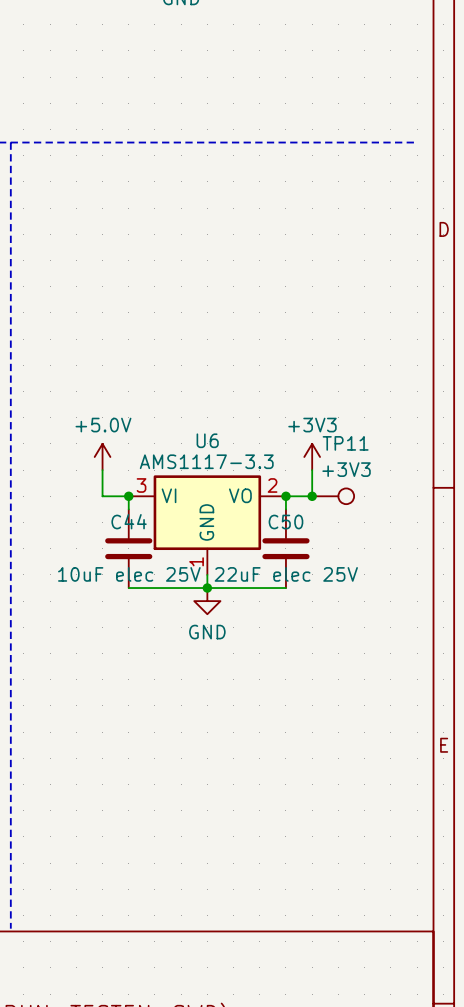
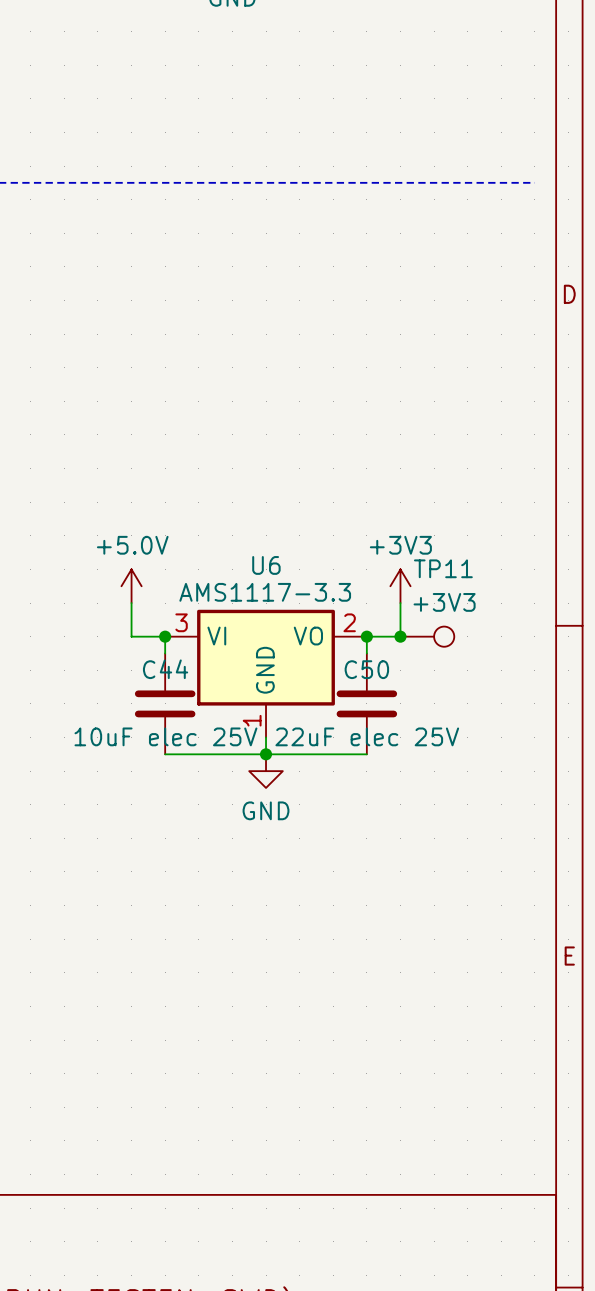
line: (10, 142) (10, 928) -> none

